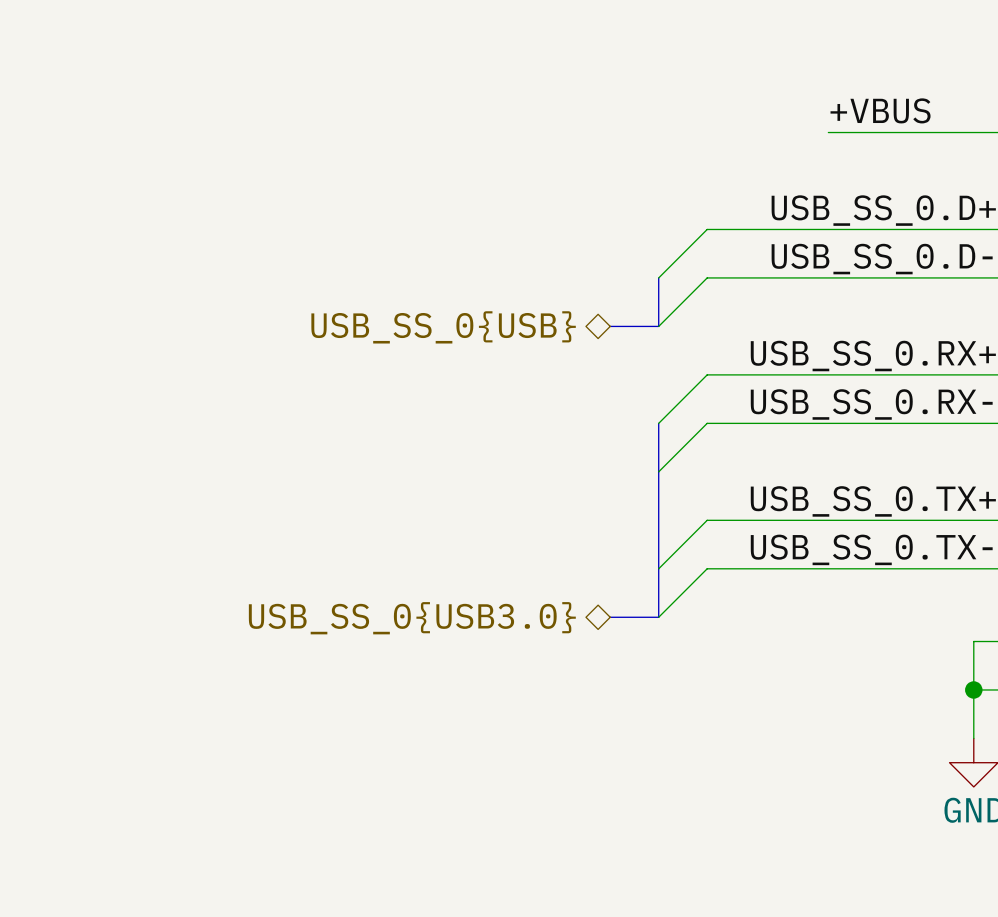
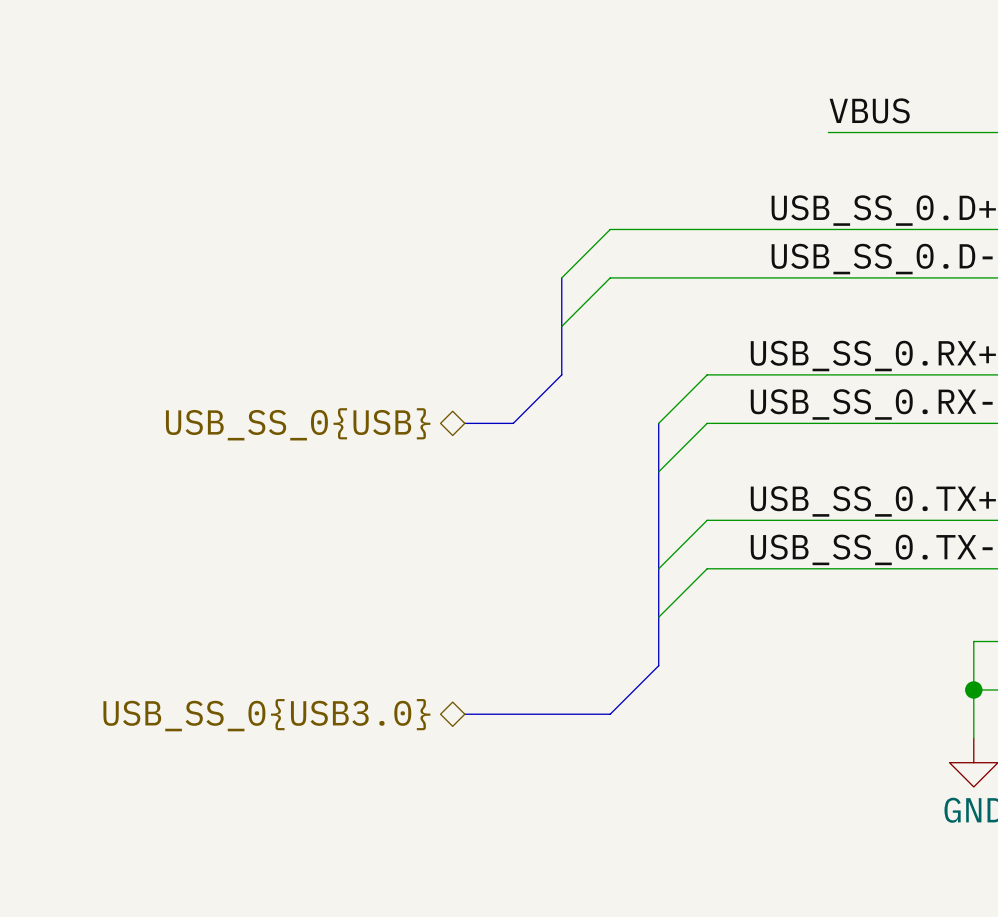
label: +VBUS (880, 110) -> VBUS (869, 110)
wire: (707, 229) (658, 277) -> (707, 229) (610, 229) (561, 277)
bus: none -> (561, 277) (561, 374) (513, 423) (464, 423)
bus: (658, 277) (658, 326) (610, 326) -> none
wire: (707, 277) (658, 326) -> (707, 277) (610, 277) (561, 326)
hierarchical label position: USB_SS_0{USB} (443, 327) -> USB_SS_0{USB} (298, 424)
bus: (610, 617) (658, 617) -> (464, 714) (610, 714) (658, 665) (658, 617)
hierarchical label position: USB_SS_0{USB3.0} (412, 618) -> USB_SS_0{USB3.0} (266, 715)

